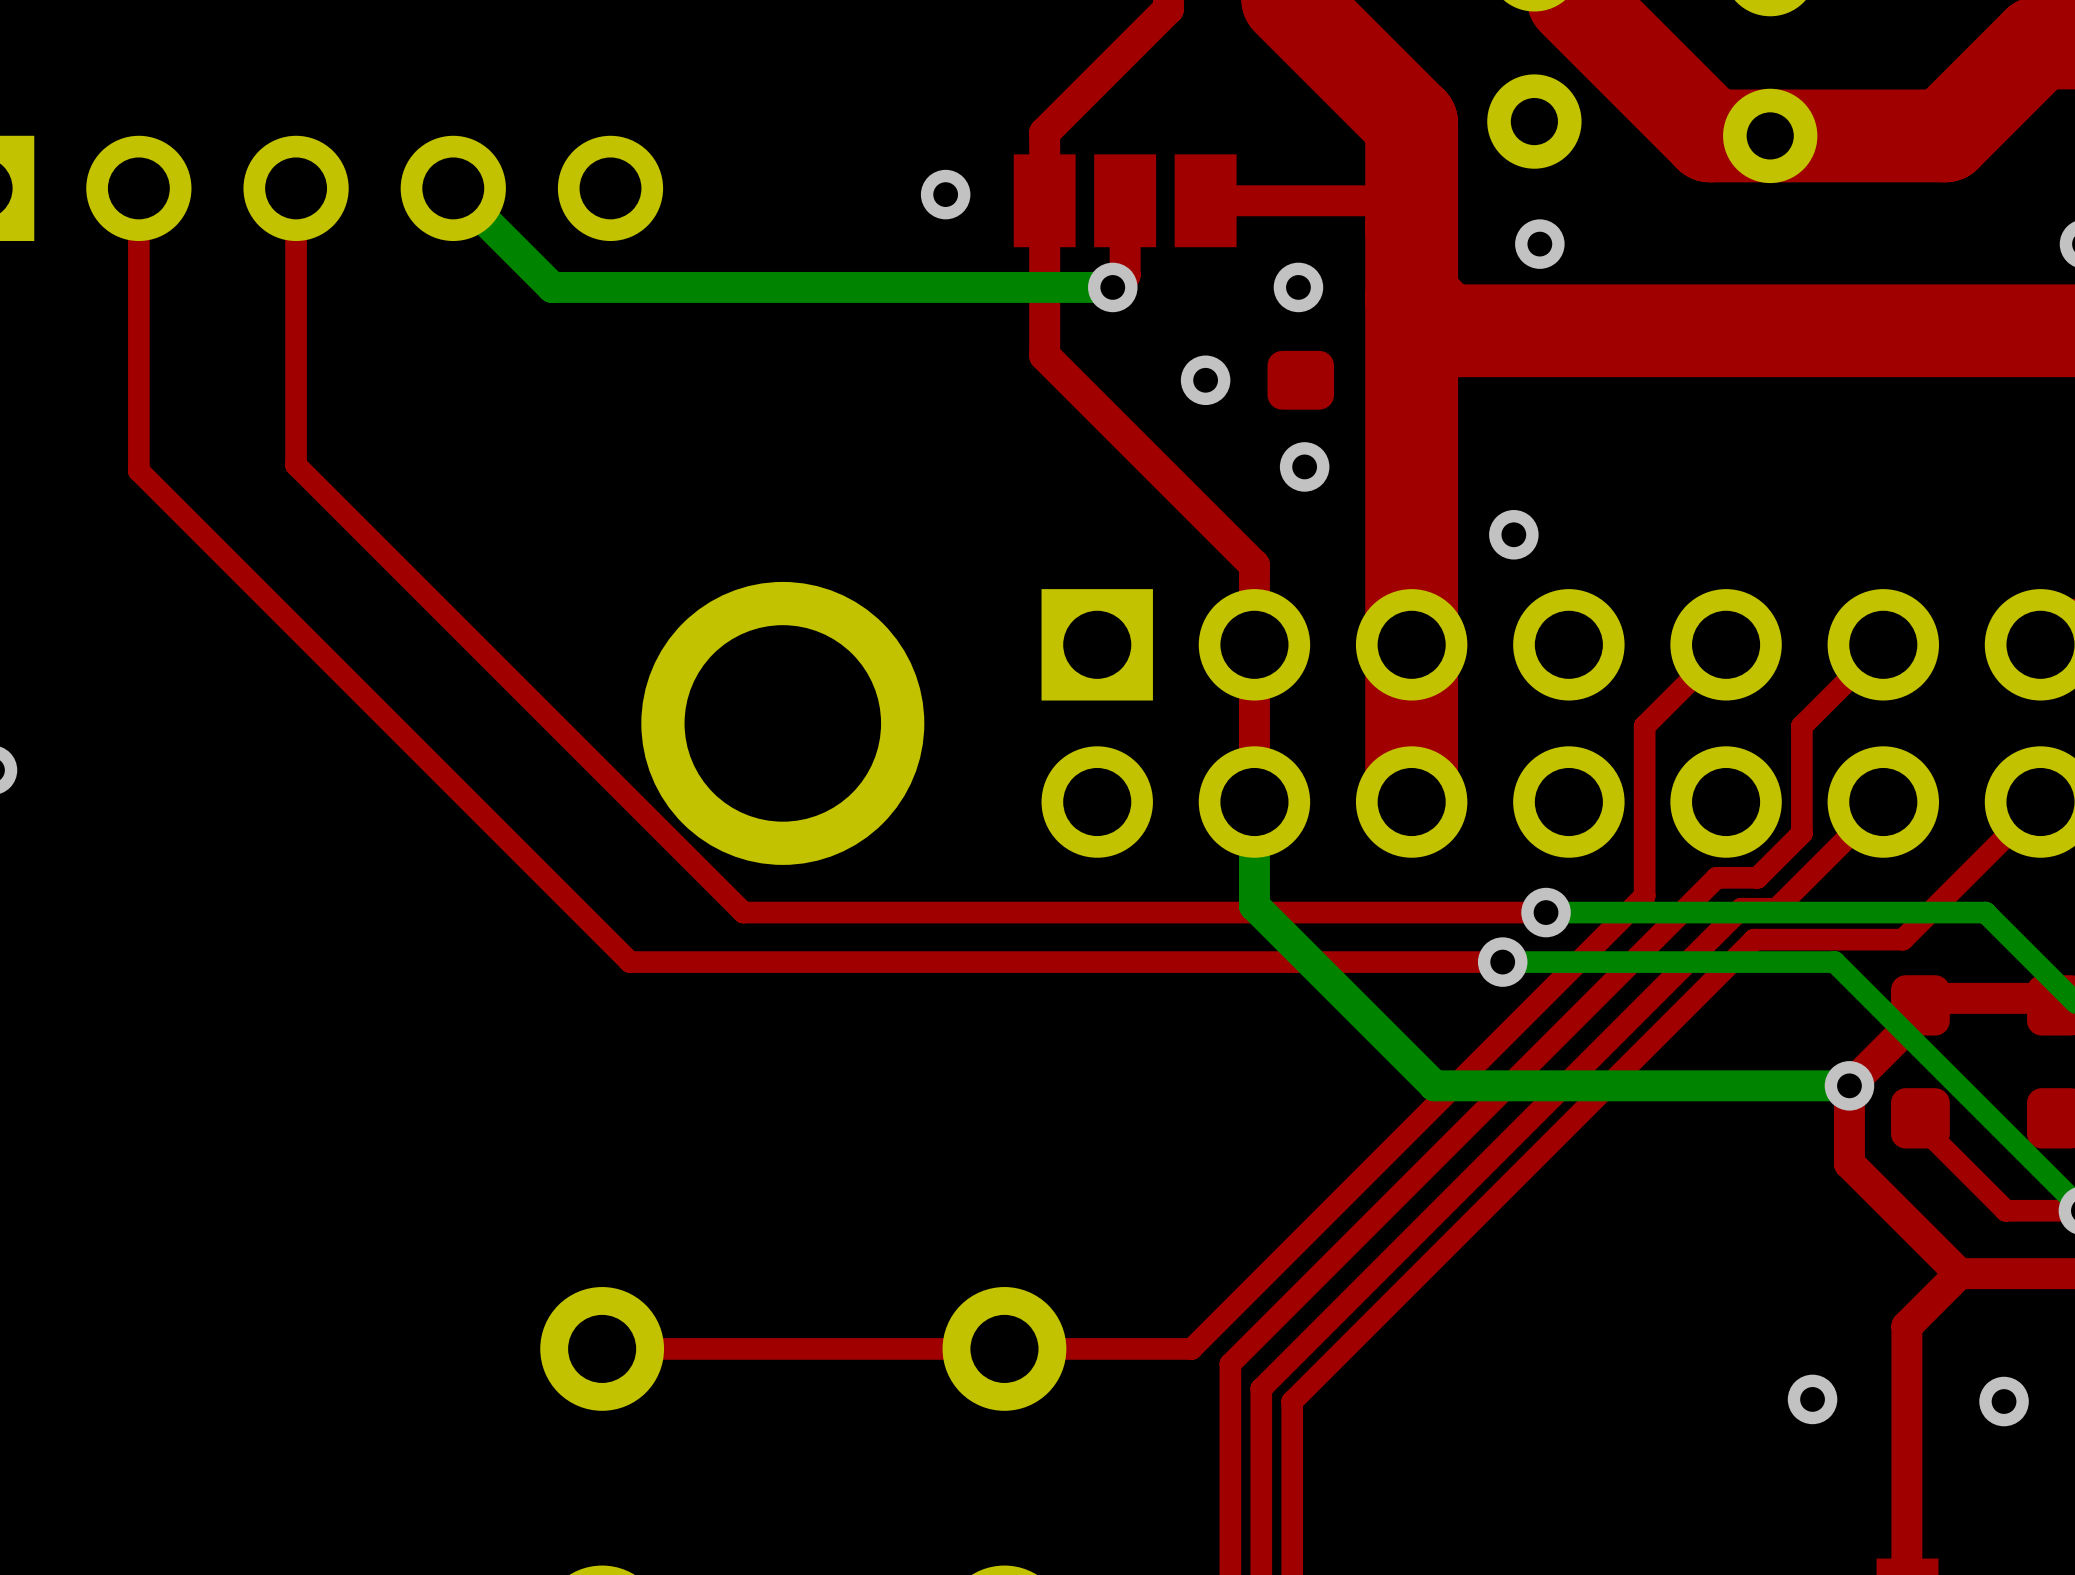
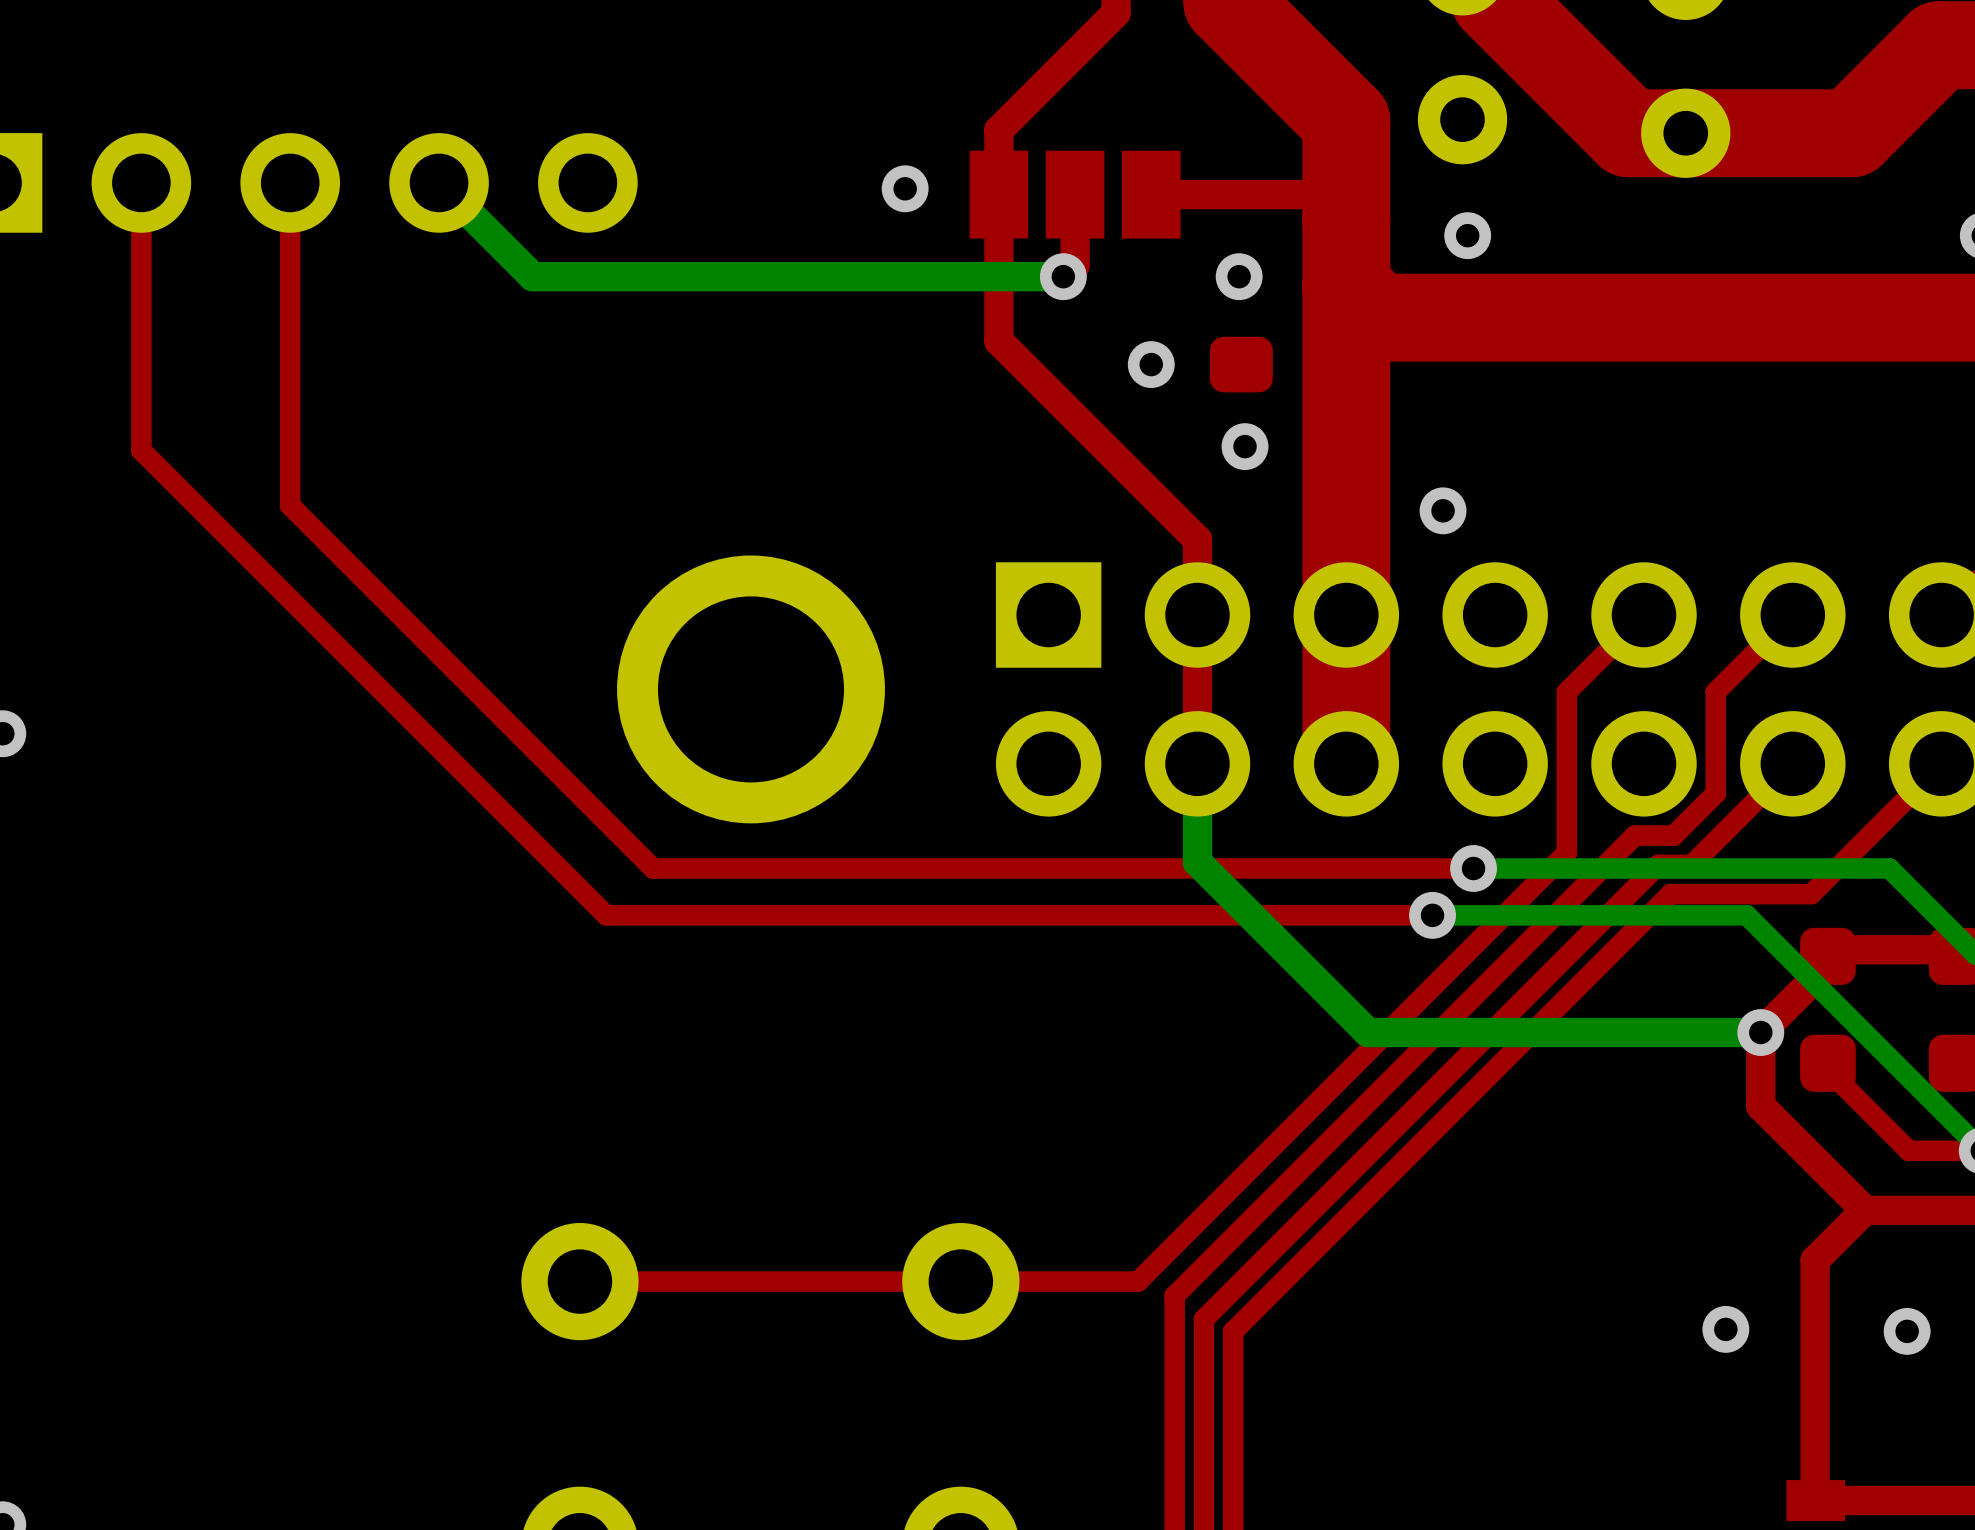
top track: (296, 465) (743, 912) -> (290, 444) (290, 505) (653, 868) (713, 868)

